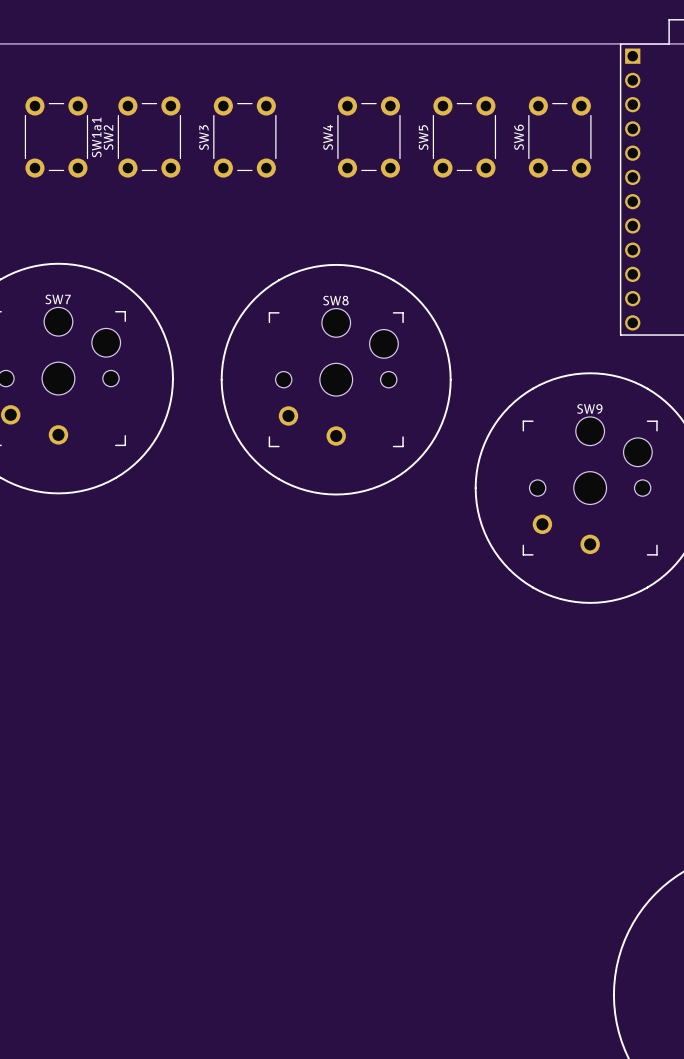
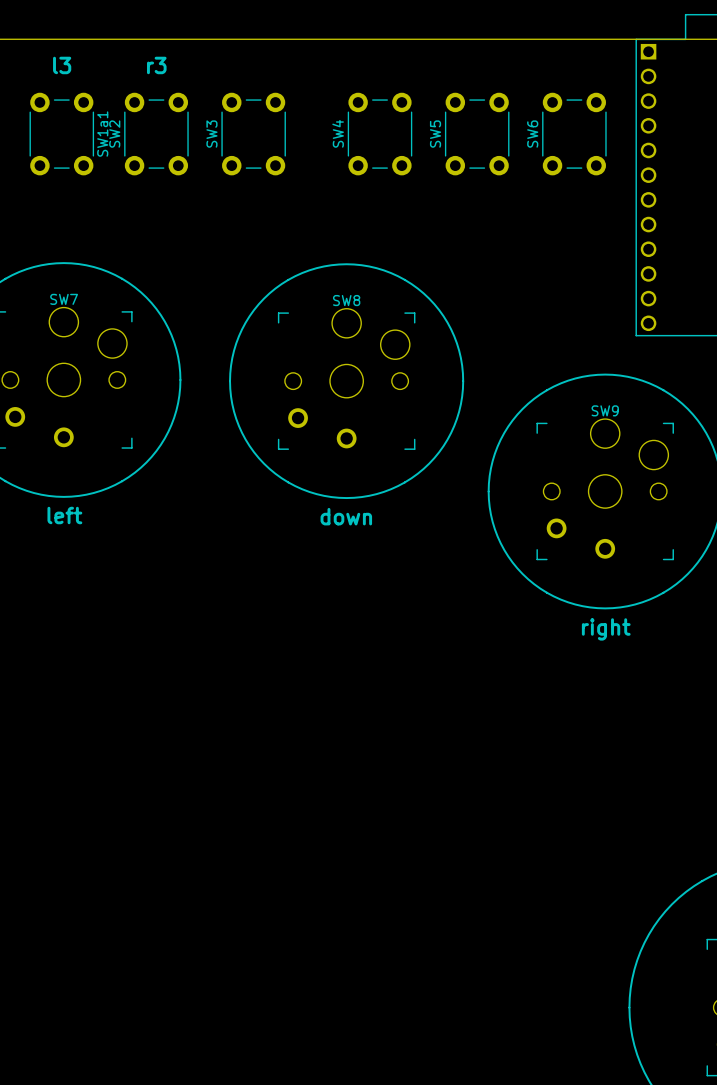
text: none -> l3 (62, 65)
text: none -> r3 (156, 65)
text: none -> left (64, 515)
text: none -> down (346, 516)
text: none -> right (606, 629)

